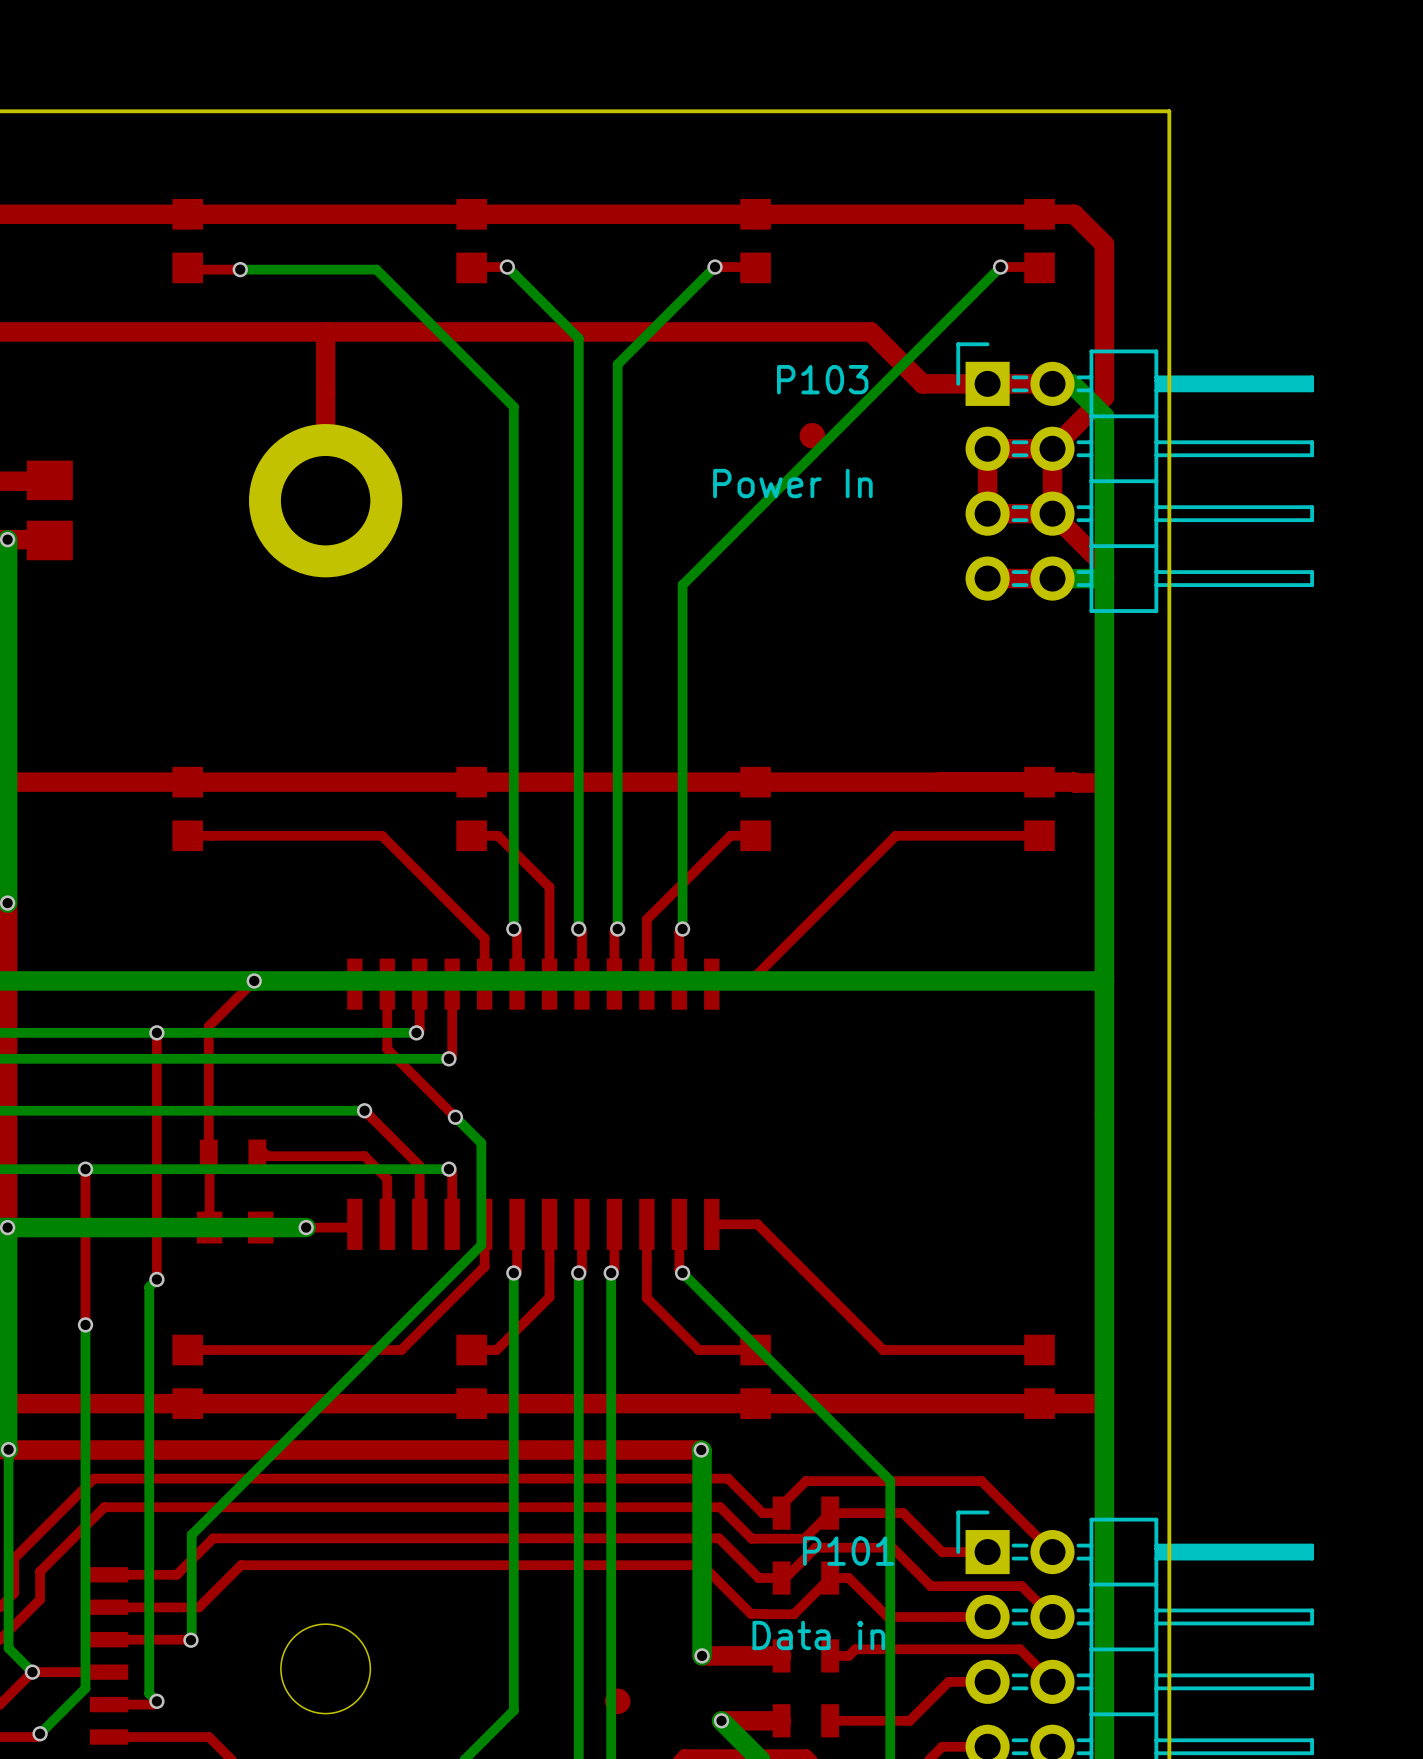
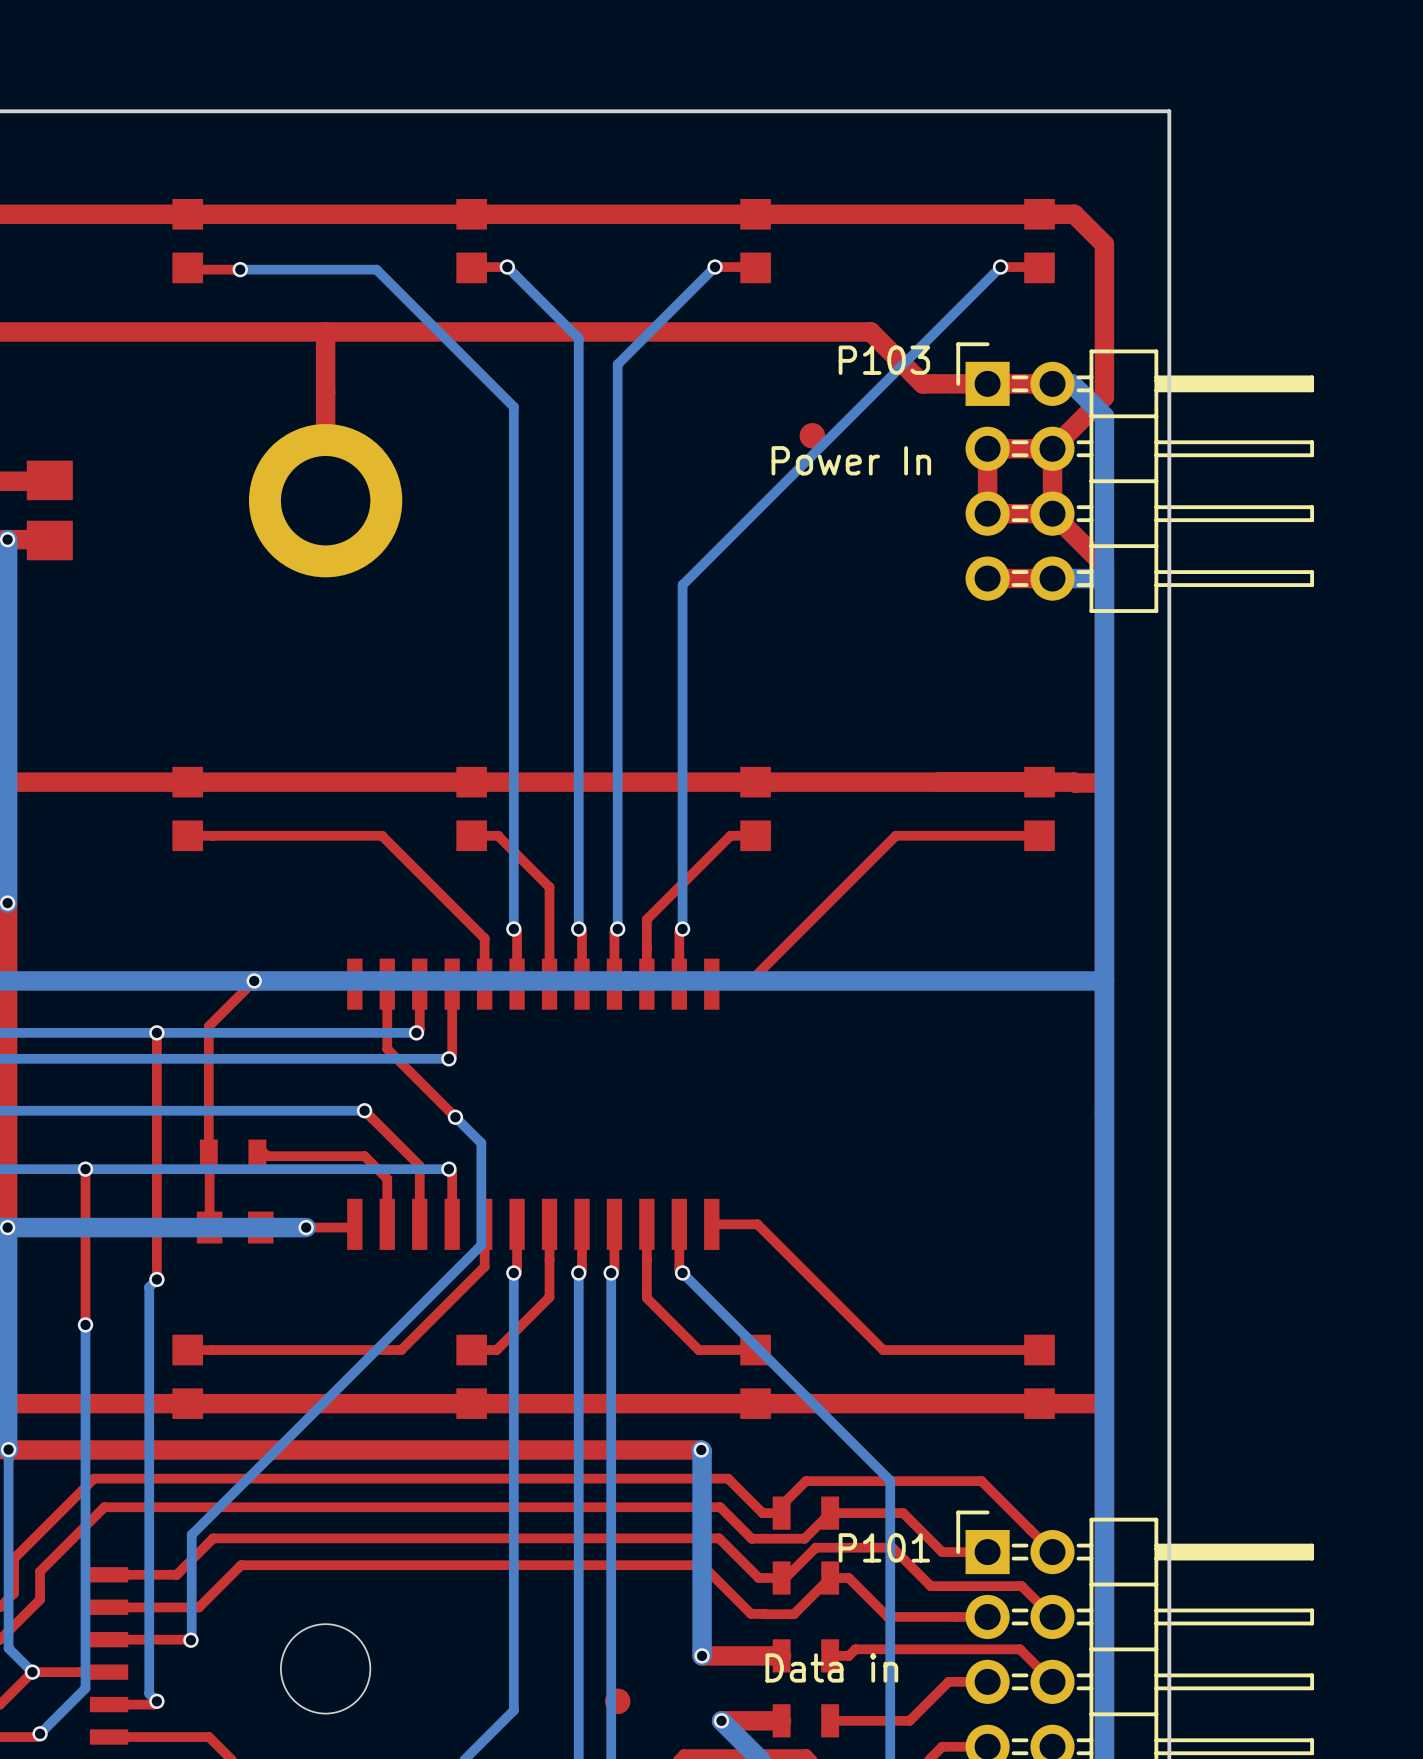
P103 name position: P103 (822, 379) -> P103 (884, 360)
P103 value position: Power In (792, 483) -> Power In (851, 460)
P101 name position: P101 (848, 1551) -> P101 (884, 1547)
P101 value position: Data in (818, 1635) -> Data in (831, 1667)

